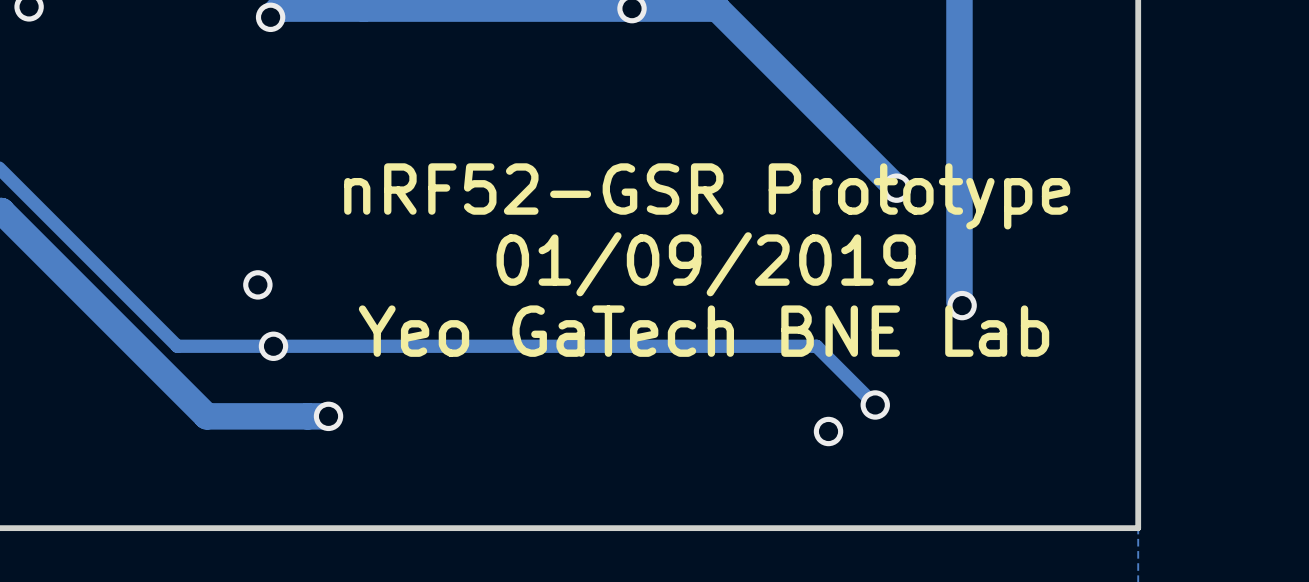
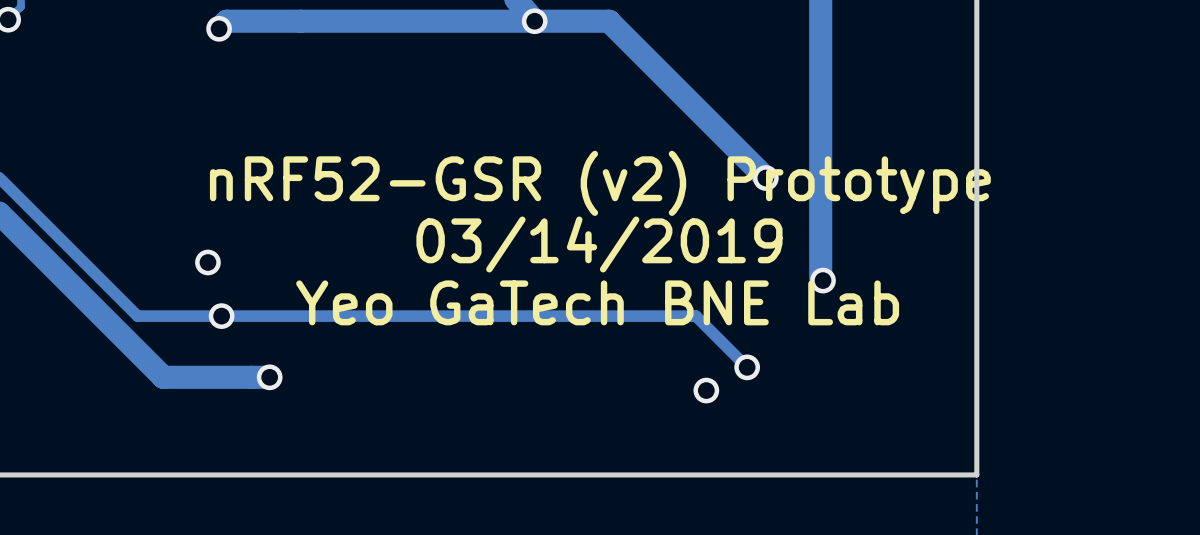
text: nRF52-GSR Prototype (707, 196) -> nRF52-GSR (v2) Prototype (600, 183)
text: 01/09/2019 (706, 264) -> 03/14/2019 (599, 244)

